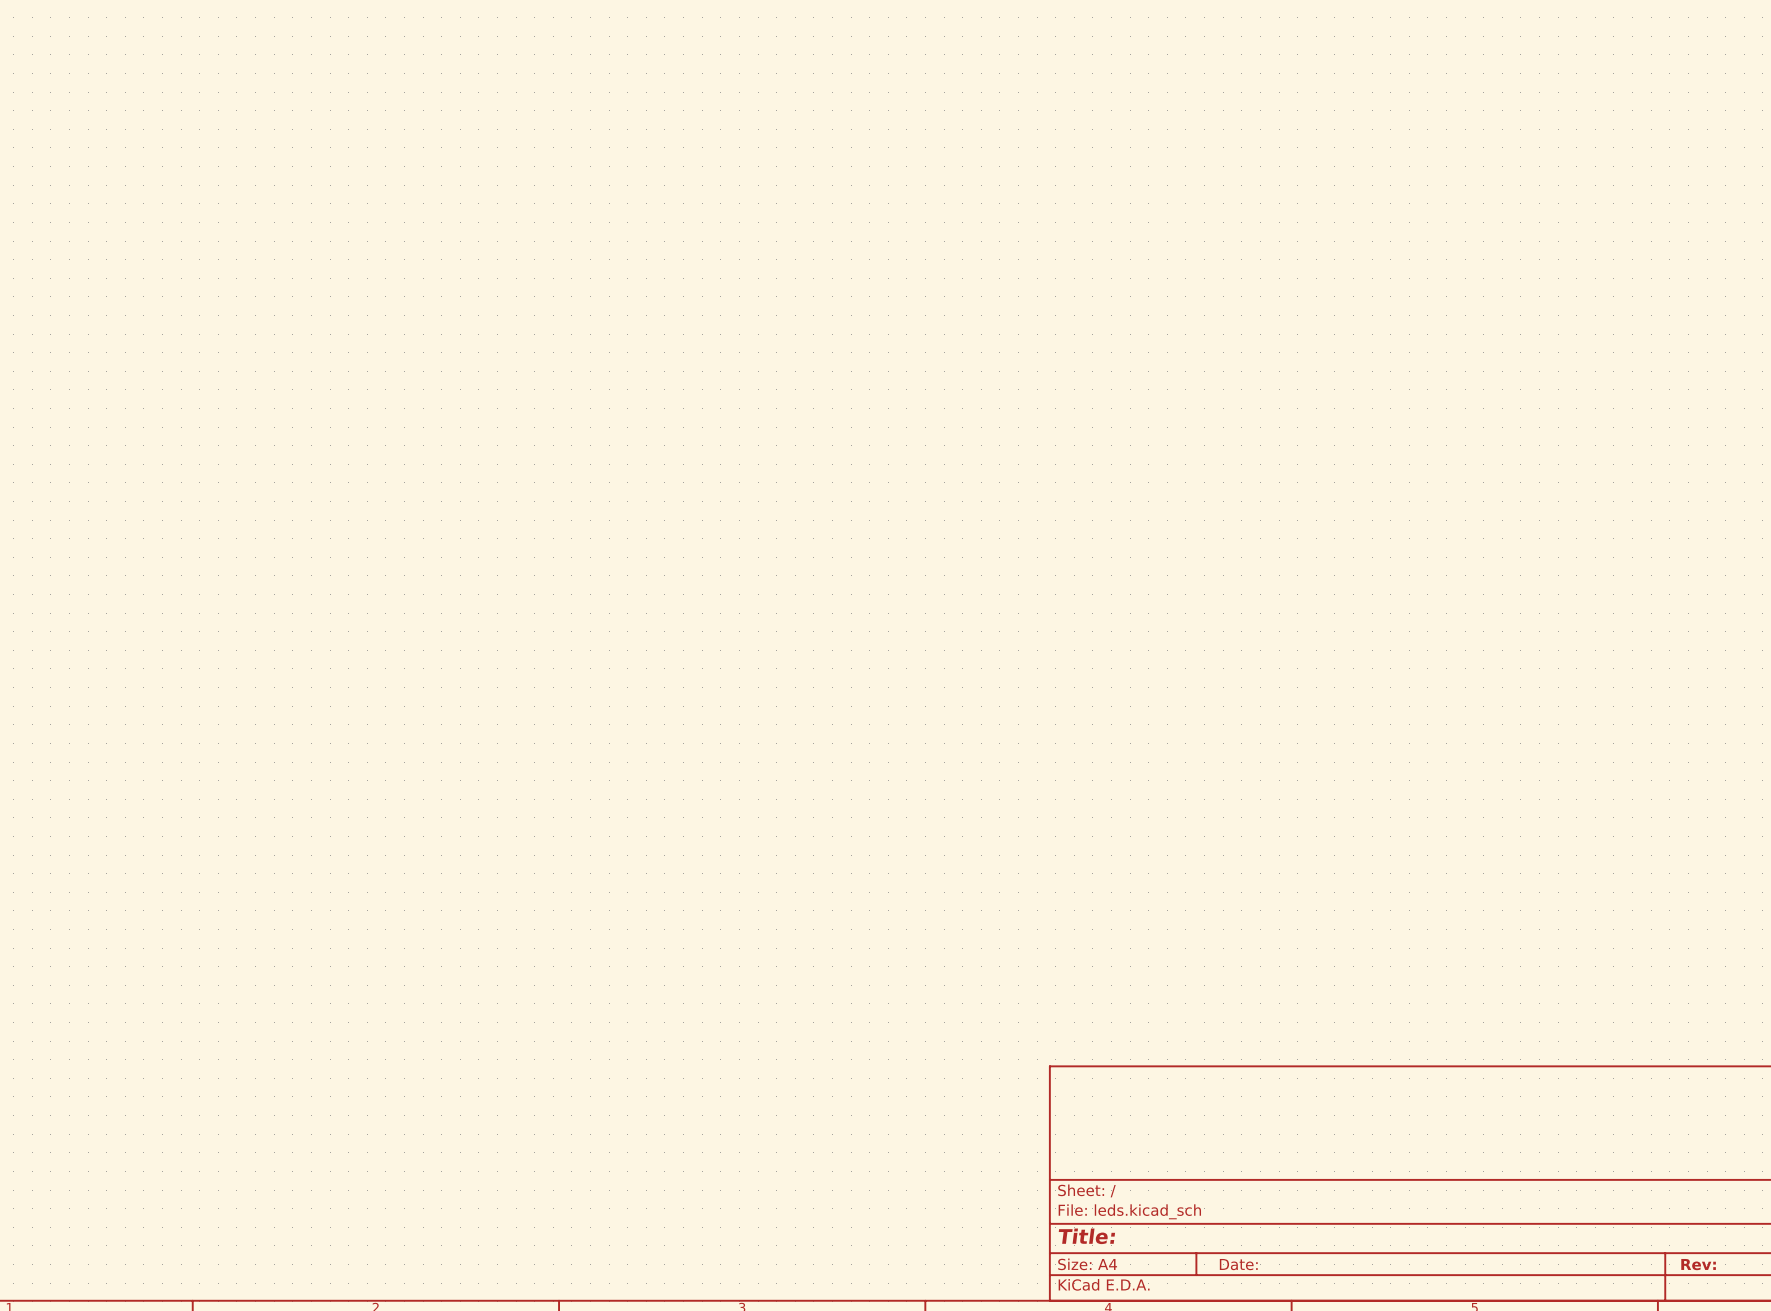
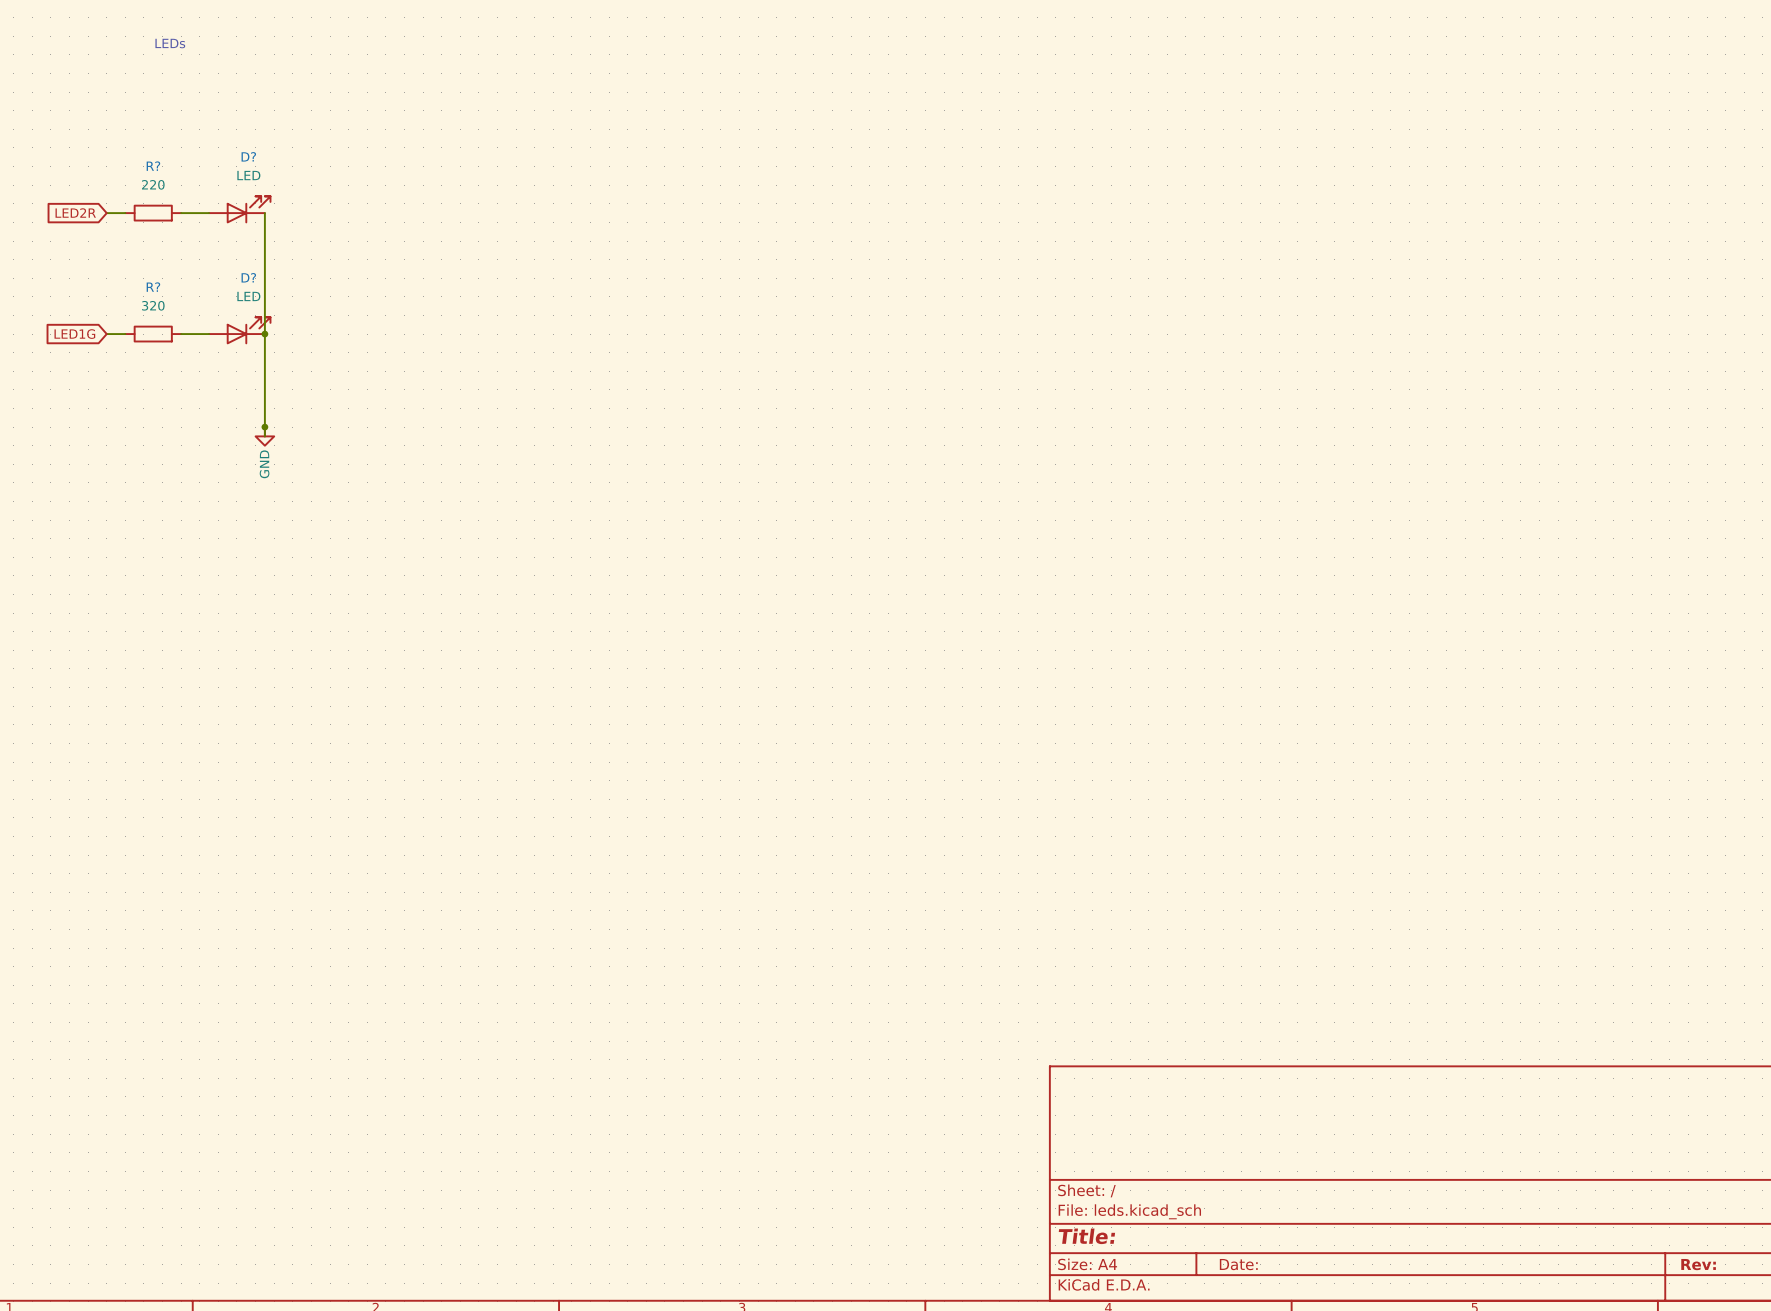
text: none -> LEDs (170, 43)
D?: none -> LED (239, 209)
global label: none -> LED2R (75, 213)
wire: none -> (106, 213) (125, 213)
R?: none -> 220 (153, 213)
wire: none -> (181, 213) (209, 213)
wire: none -> (264, 213) (264, 436)
D?: none -> LED (239, 330)
global label: none -> LED1G (74, 334)
wire: none -> (106, 334) (125, 334)
R?: none -> 320 (153, 334)
wire: none -> (181, 334) (209, 334)
junction: none -> (264, 334)
junction: none -> (264, 427)
power symbol: none -> GND (264, 436)

